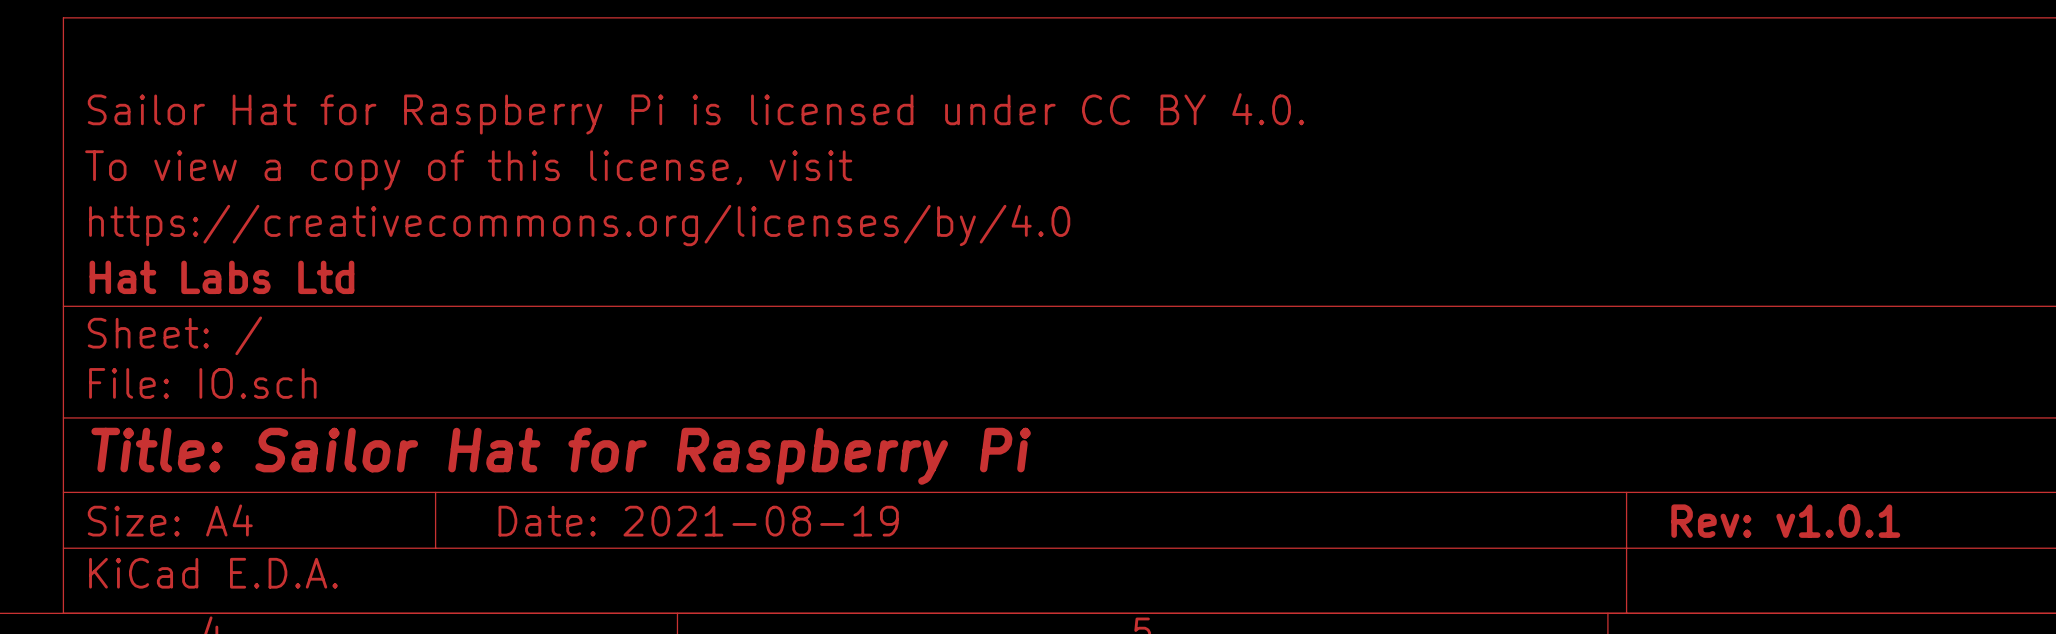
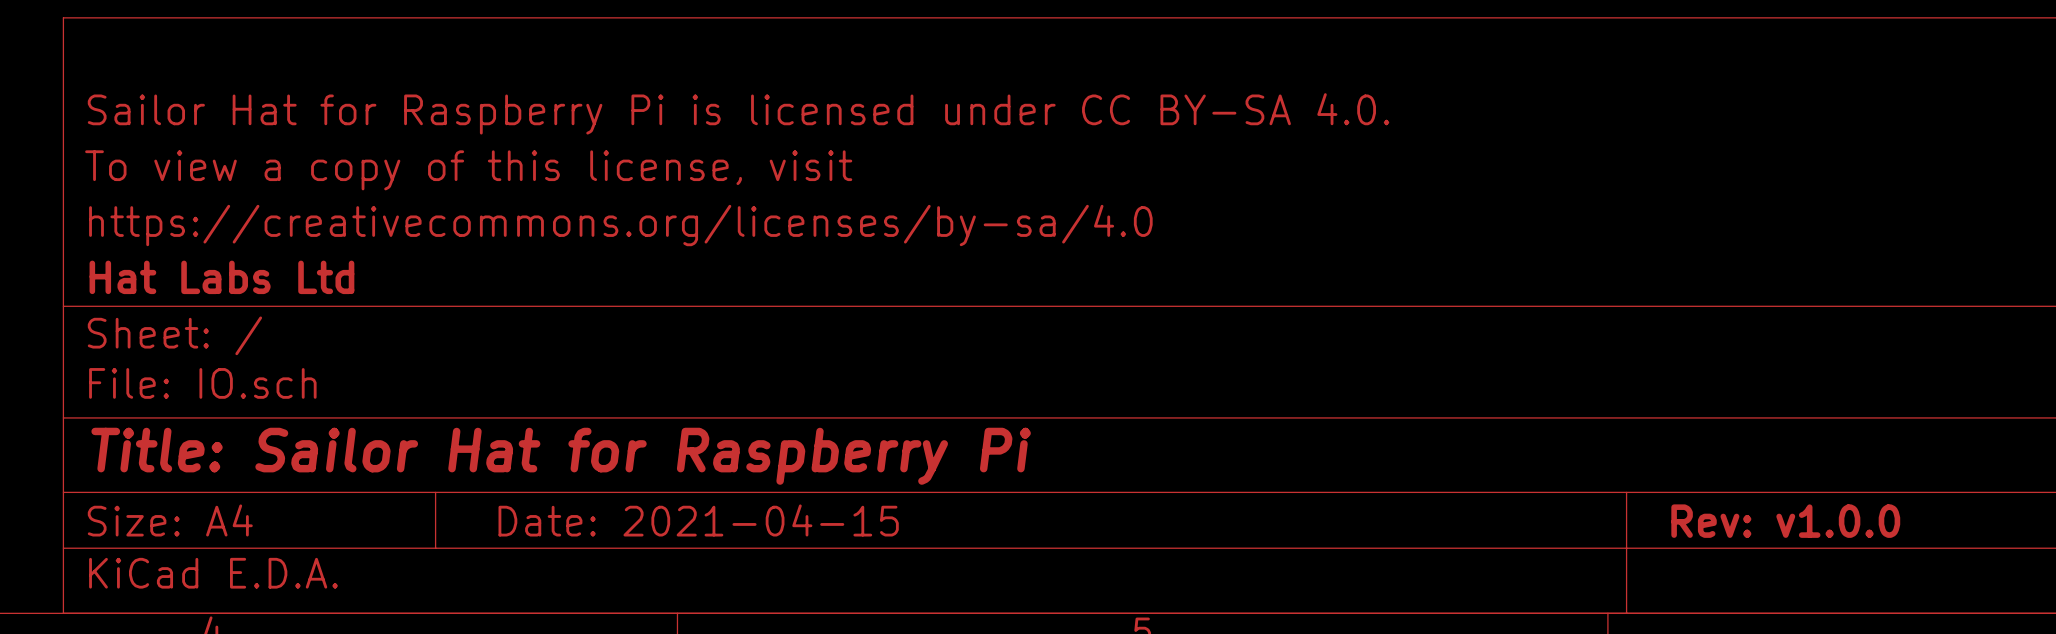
title block: Sailor Hat for Raspberry Pi is licensed under CC BY 4.0. (695, 113) -> Sailor Hat for Raspberry Pi is licensed under CC BY-SA 4.0. (738, 113)
title block: https://creativecommons.org/licenses/by/4.0 (579, 225) -> https://creativecommons.org/licenses/by-sa/4.0 (620, 225)
title block: Date: 2021-08-19 (698, 521) -> Date: 2021-04-15 (698, 520)
title block: Rev: v1.0.1 (1785, 521) -> Rev: v1.0.0 (1785, 521)

